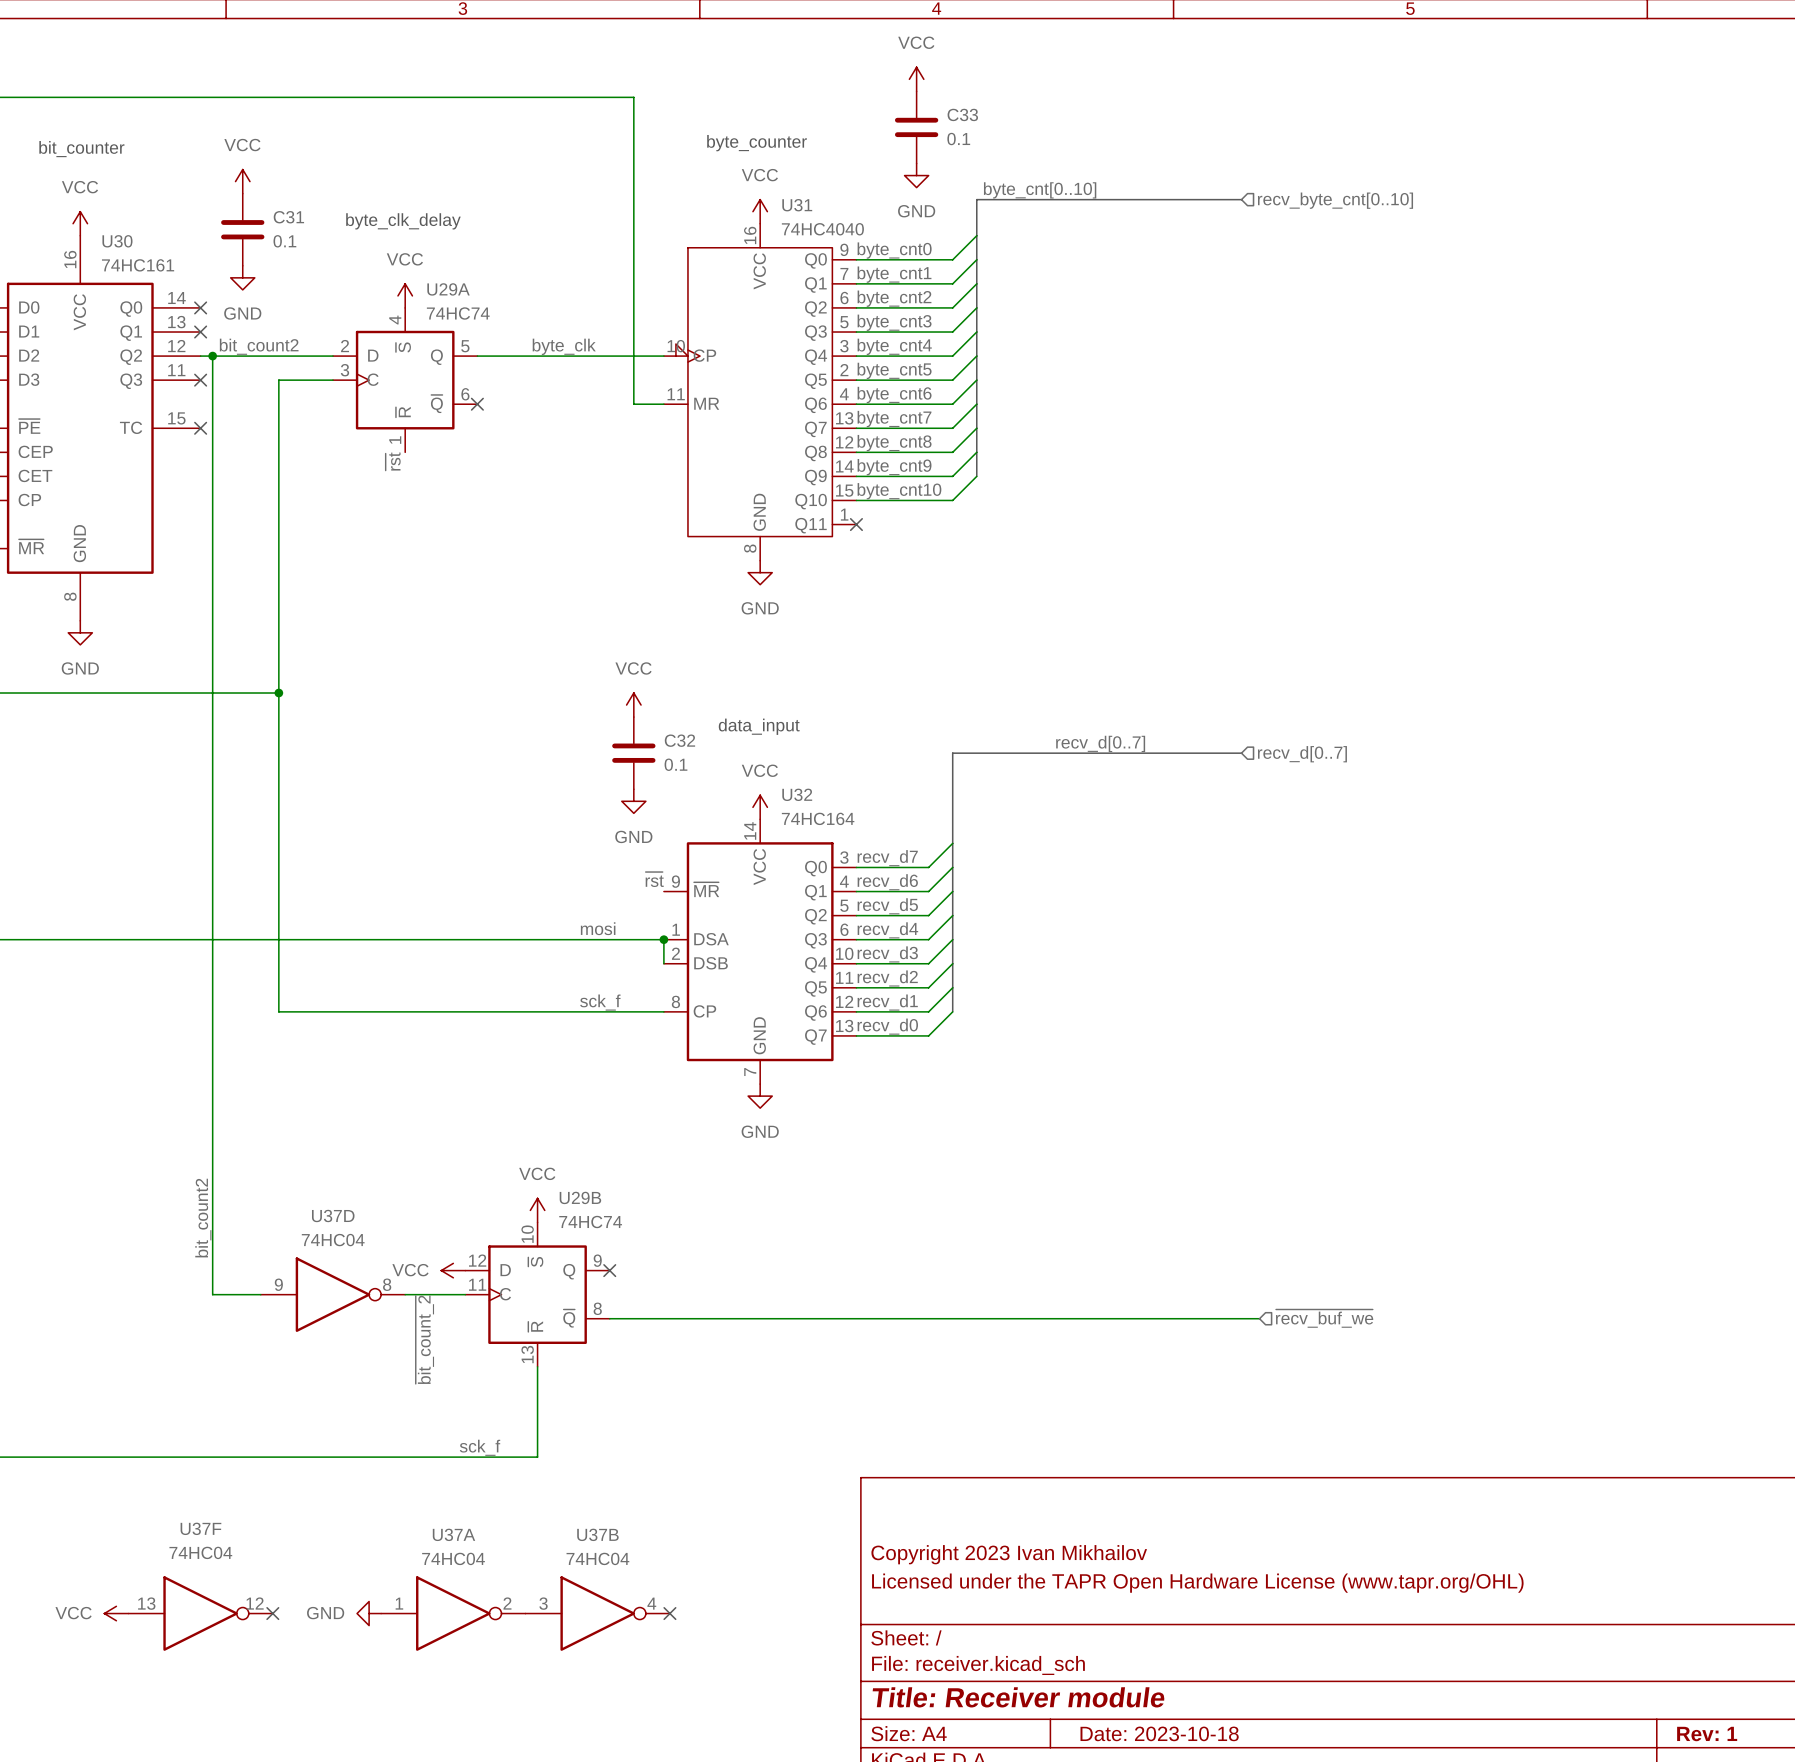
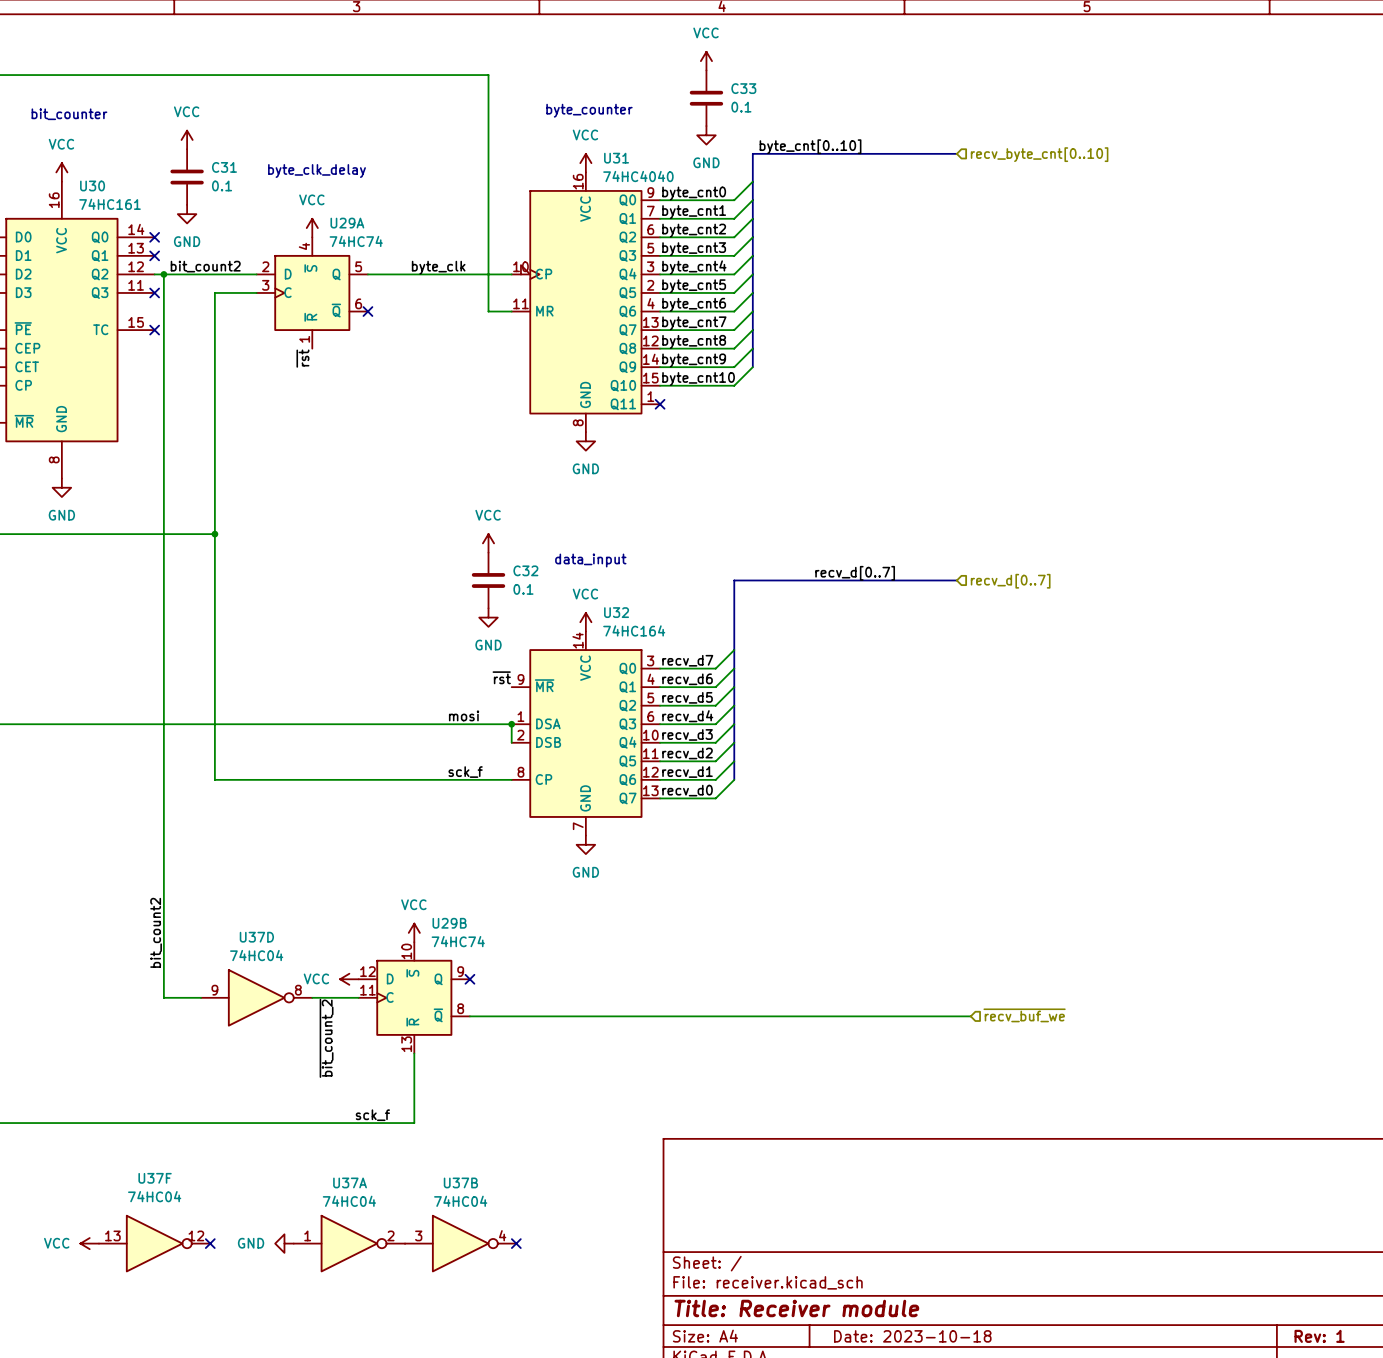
title block: Copyright 2023 Ivan Mikhailov (1009, 1554) -> none
title block: Licensed under the TAPR Open Hardware License (www.tapr.org/OHL) (1197, 1583) -> none

